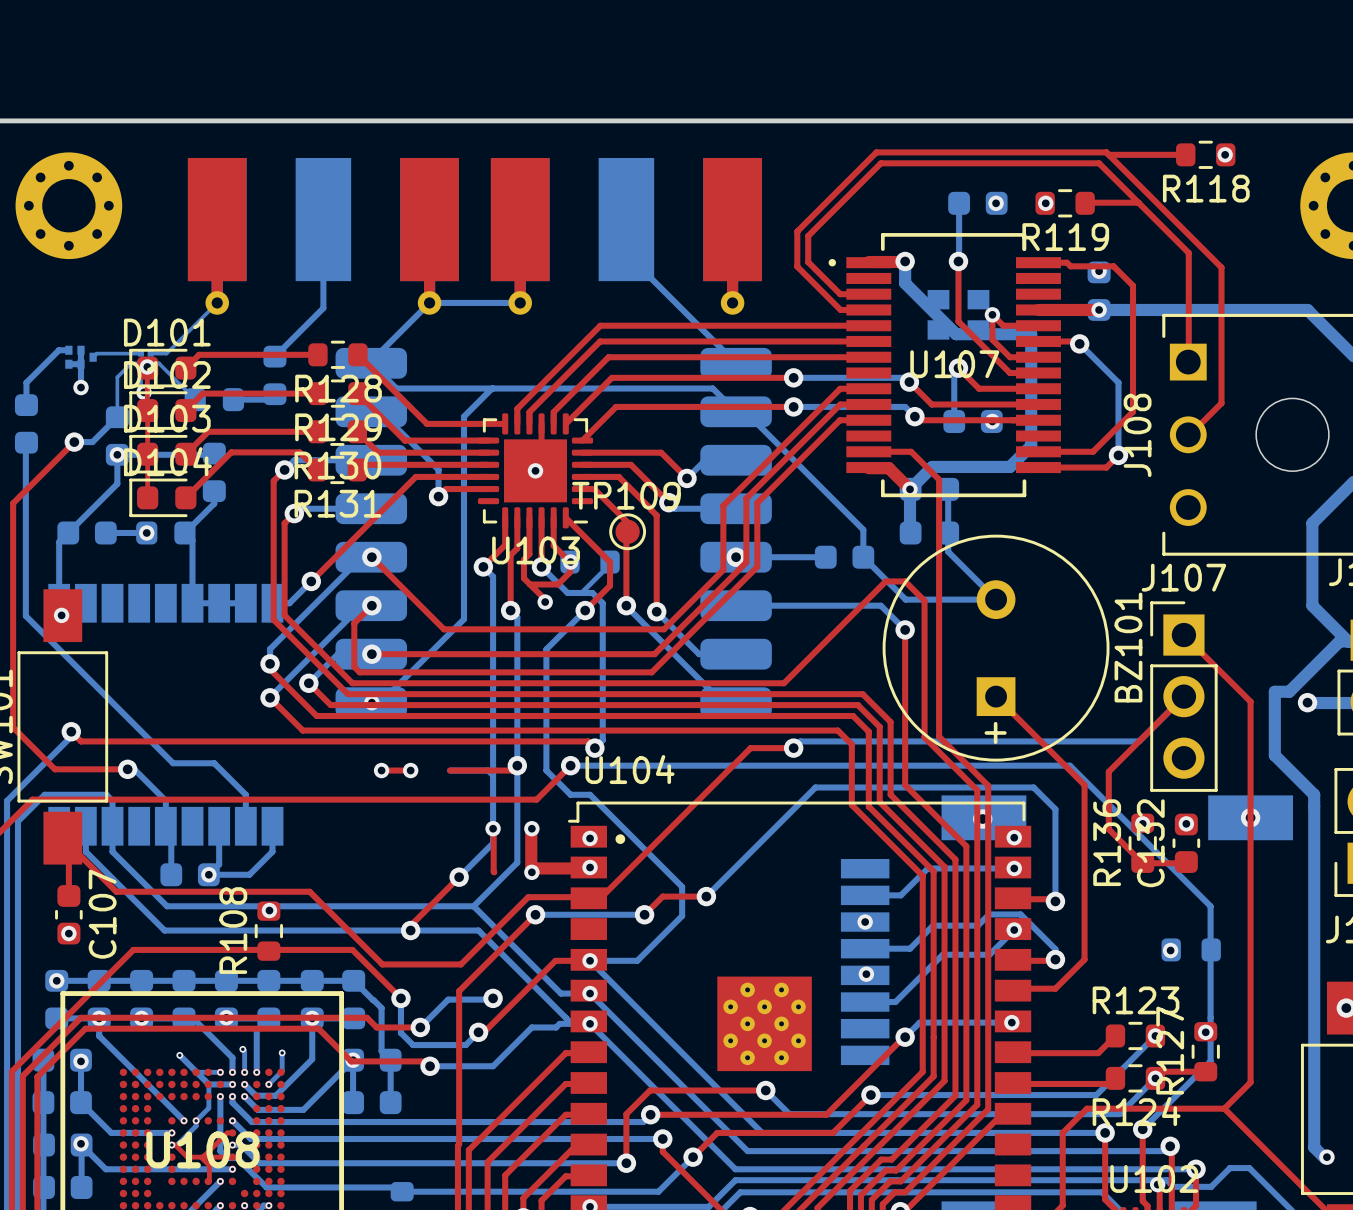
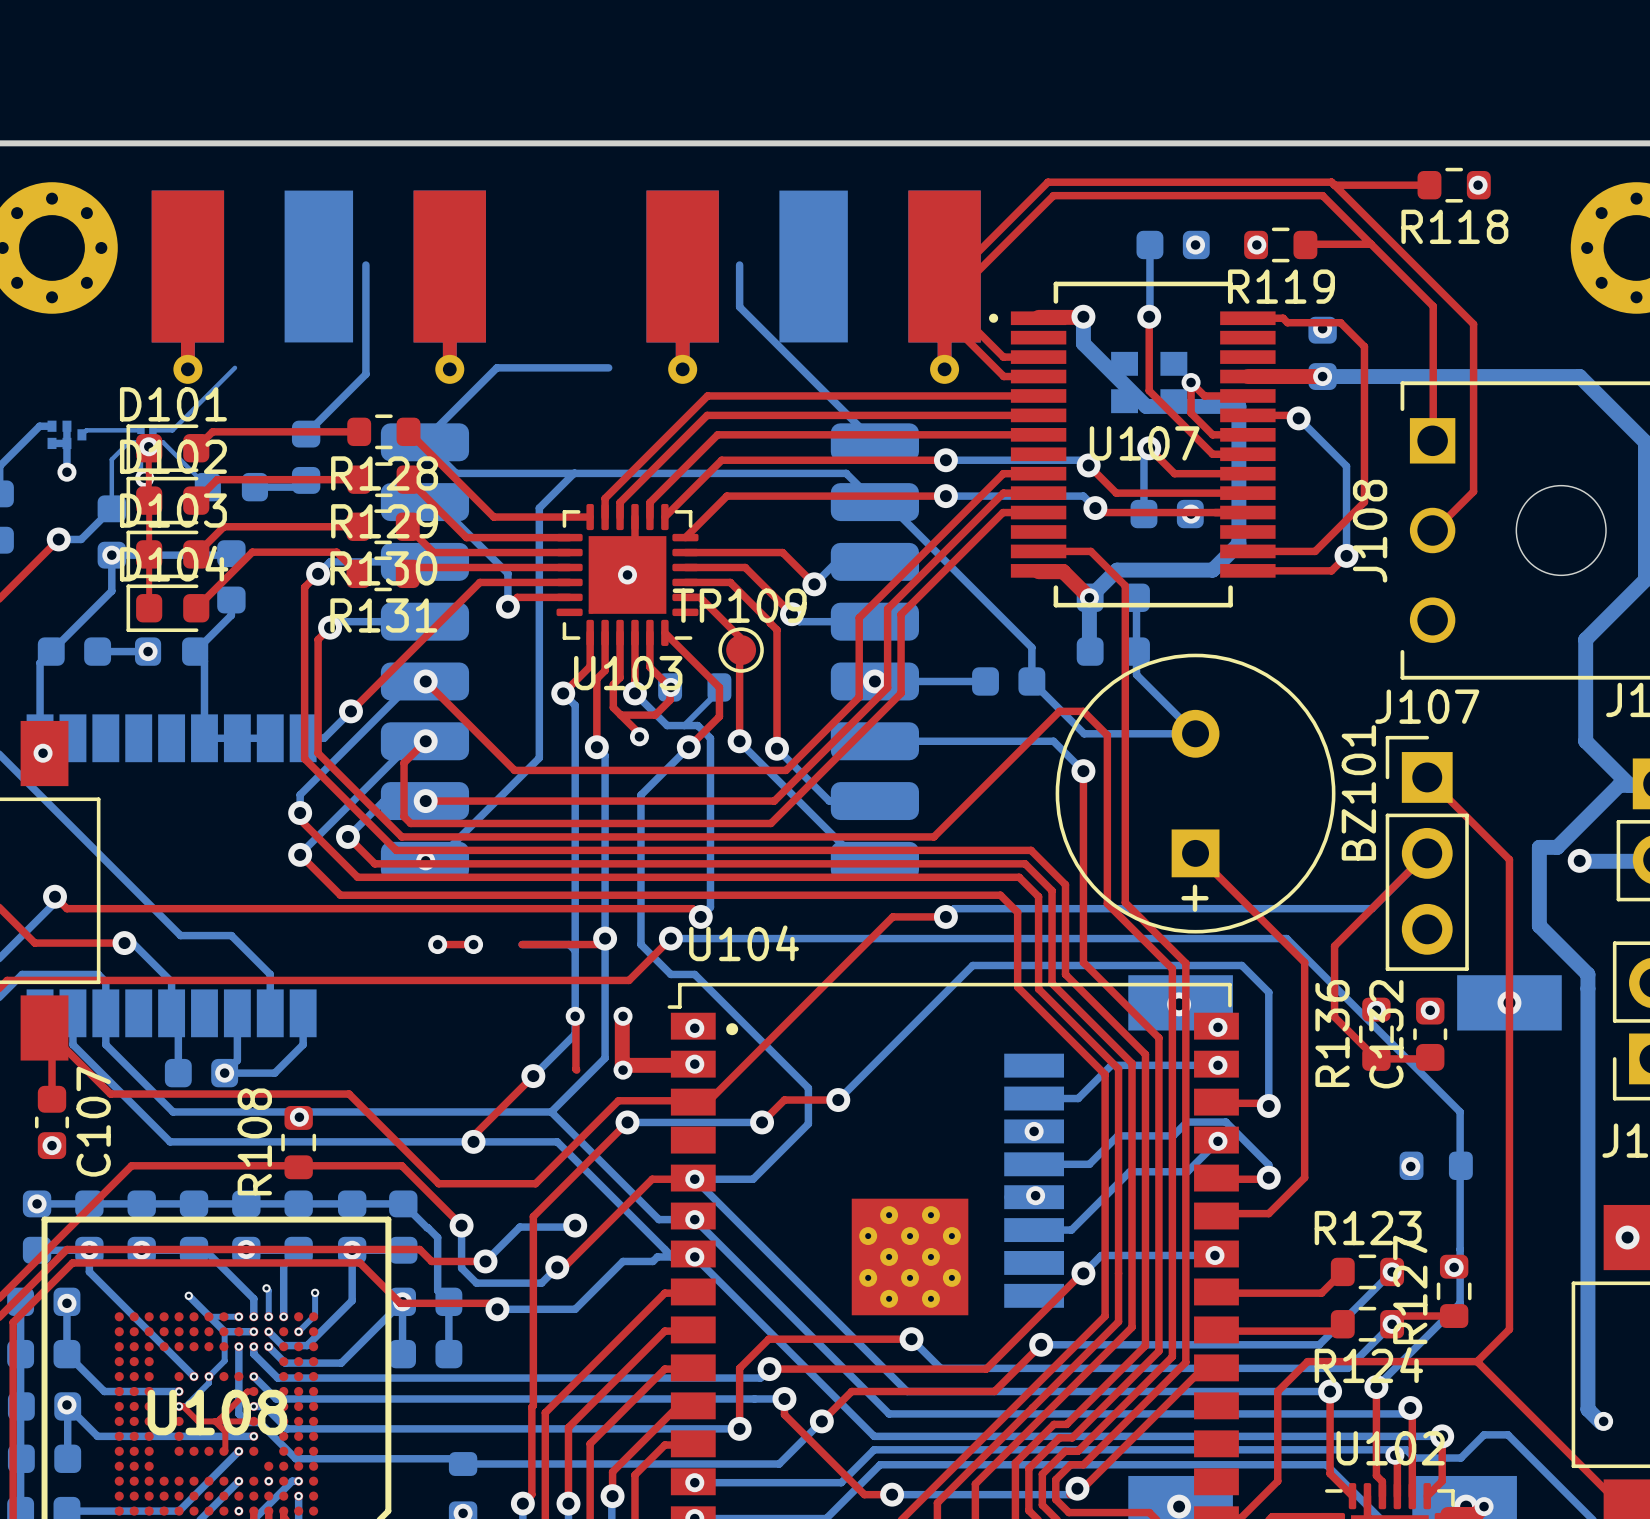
part position: (323, 236) -> (318, 287)
part position: (626, 236) -> (813, 287)

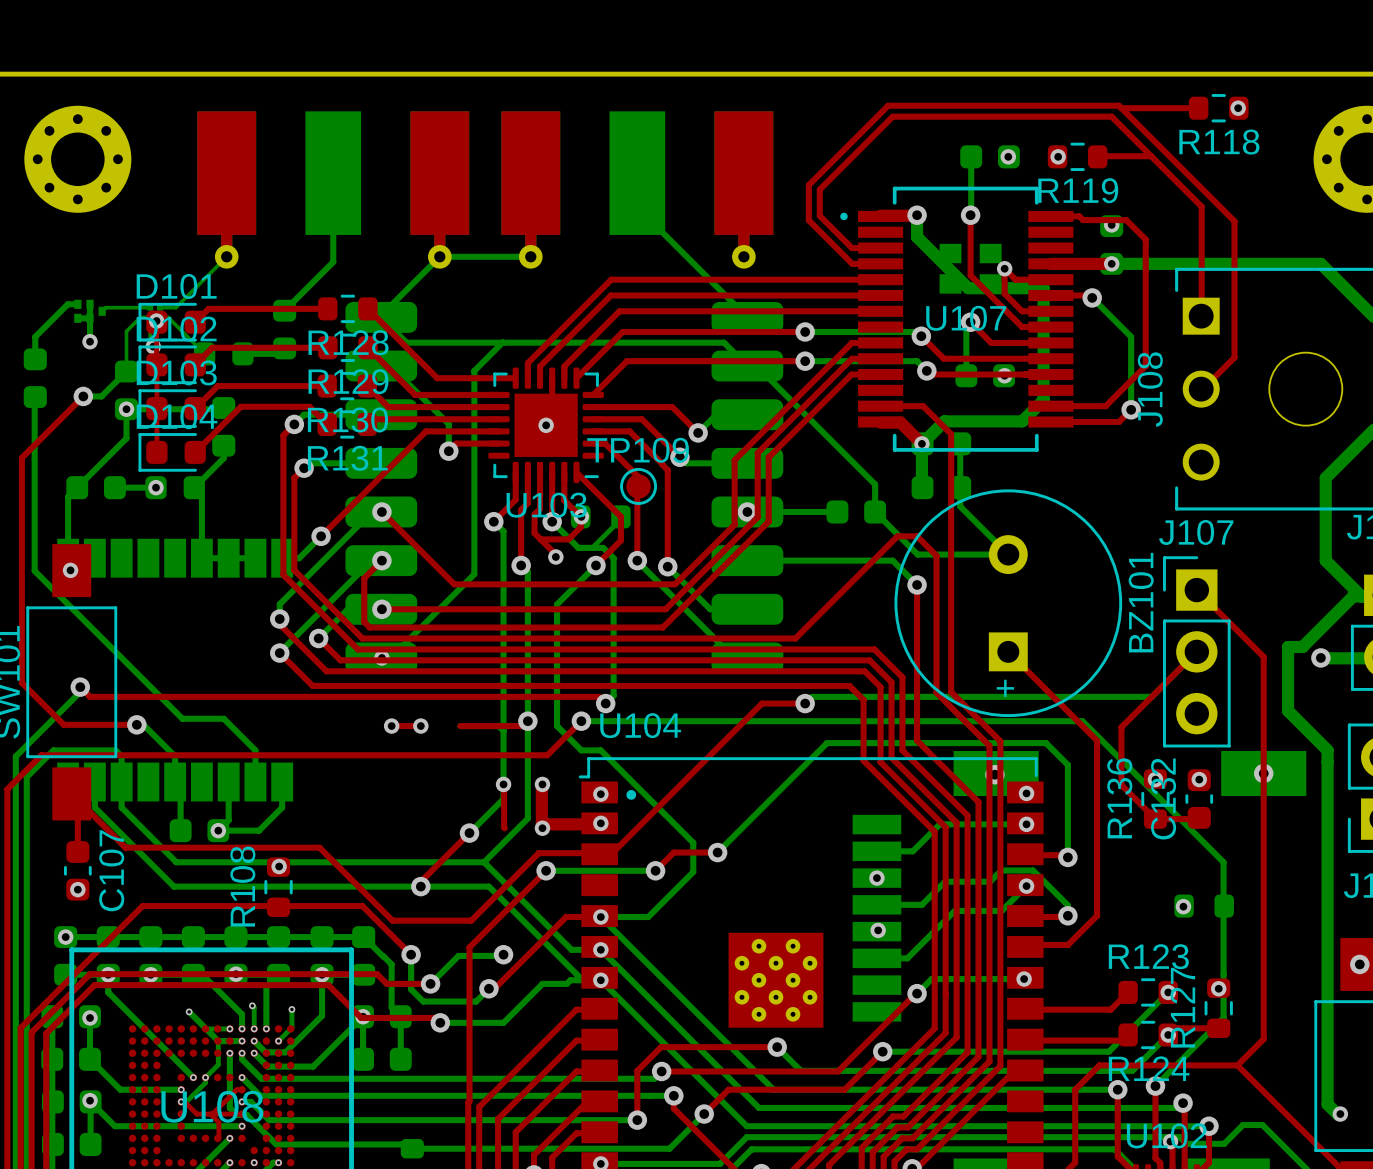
part position: (318, 287) -> (333, 189)
part position: (813, 287) -> (637, 189)

